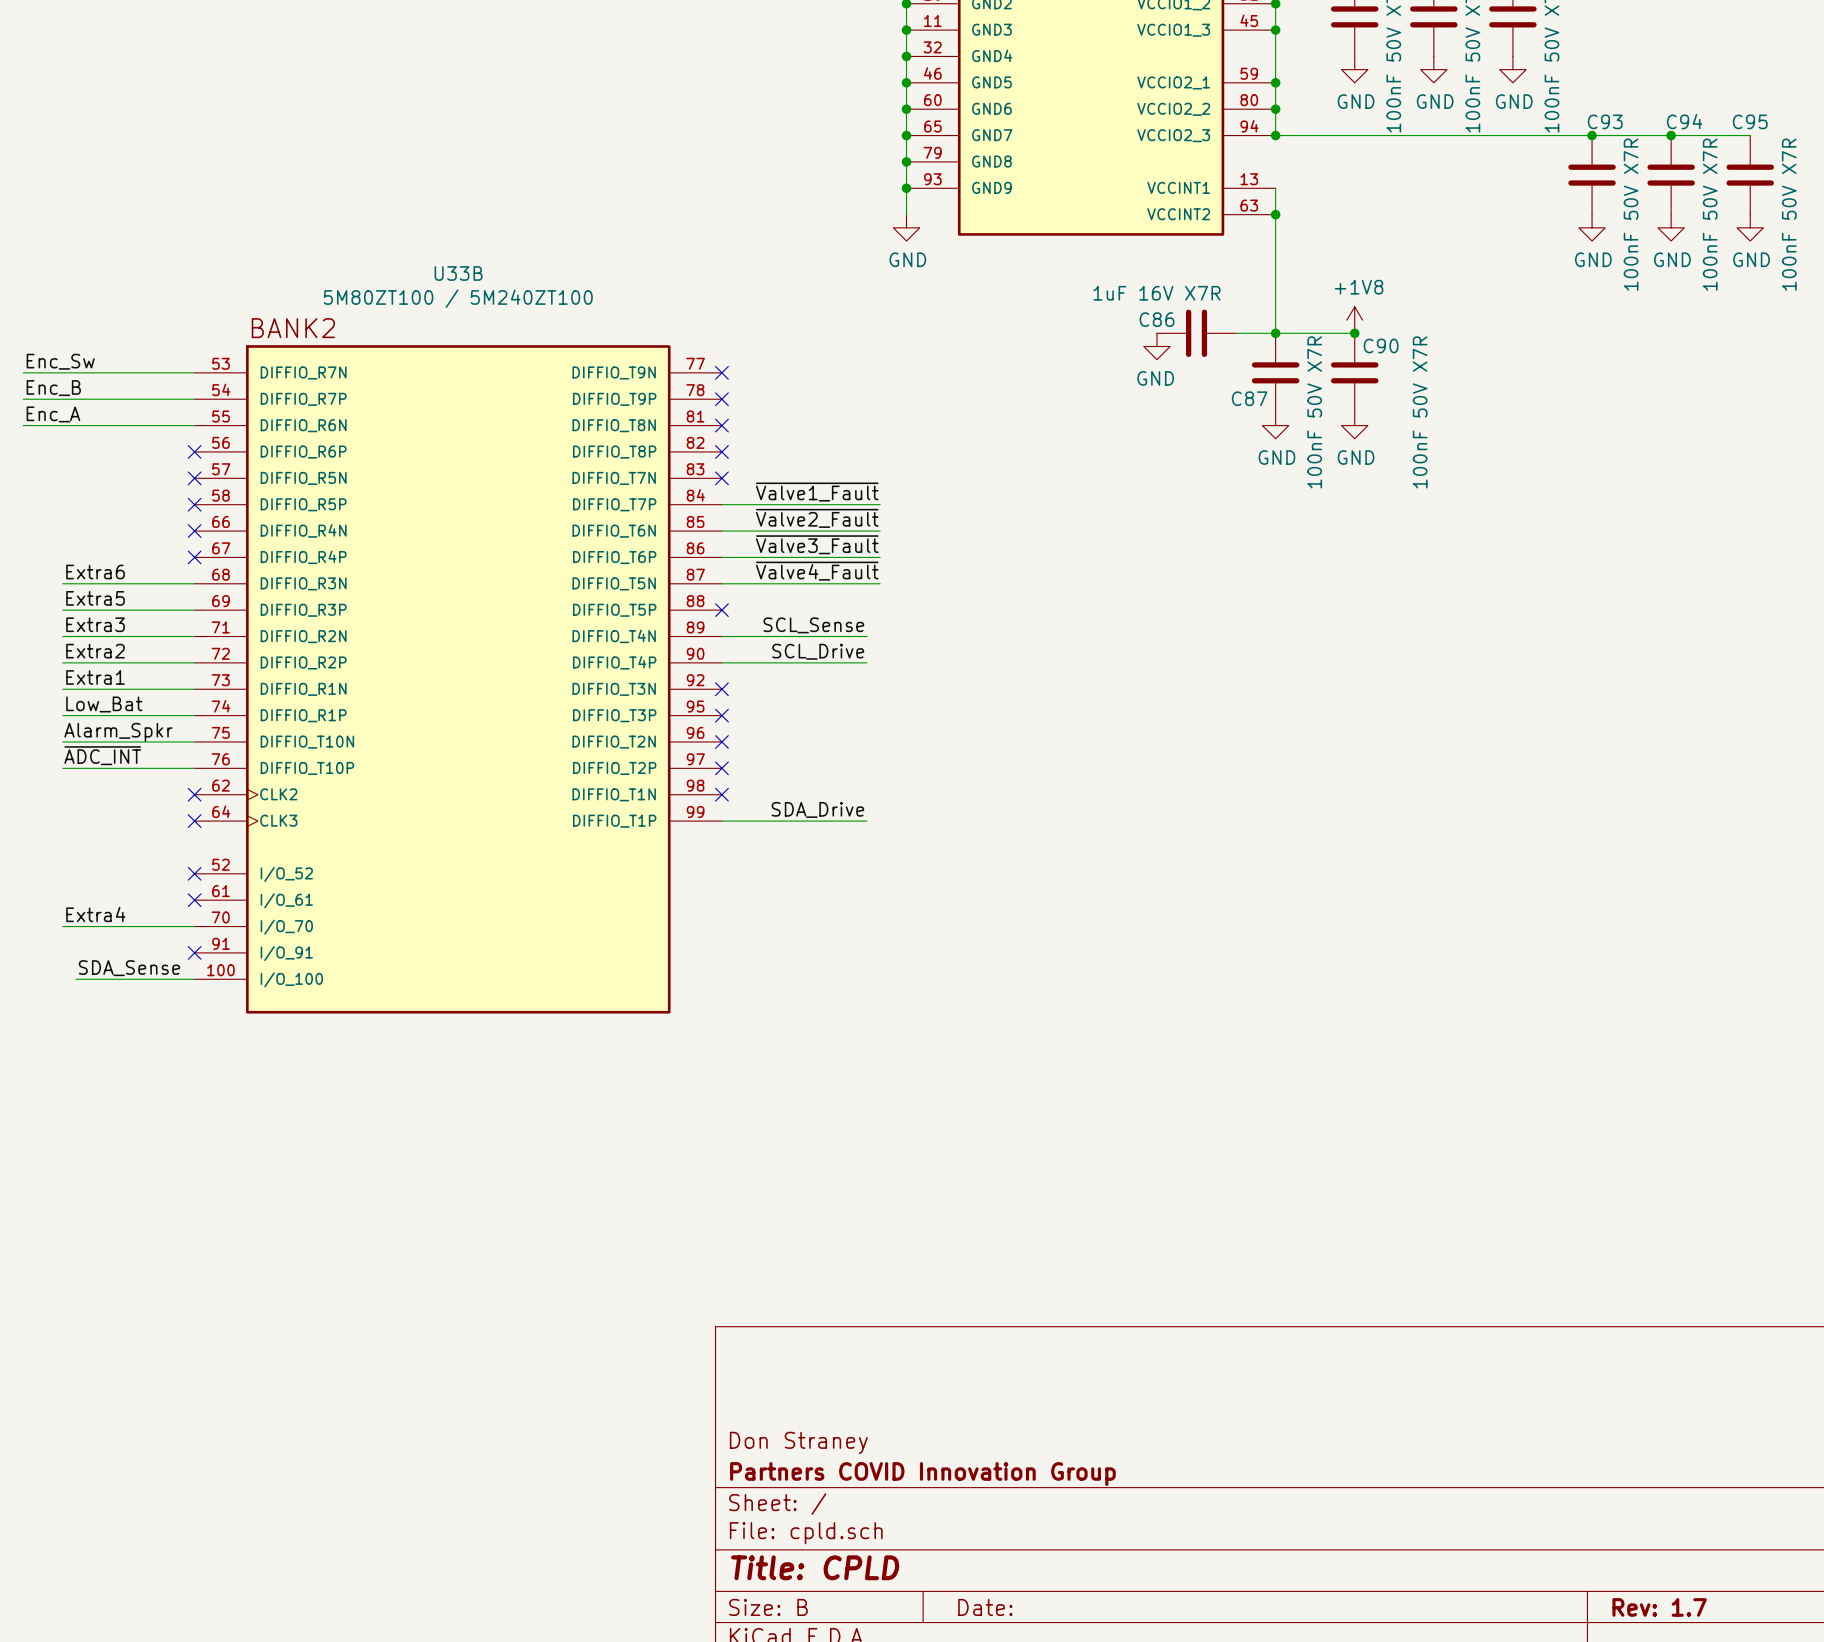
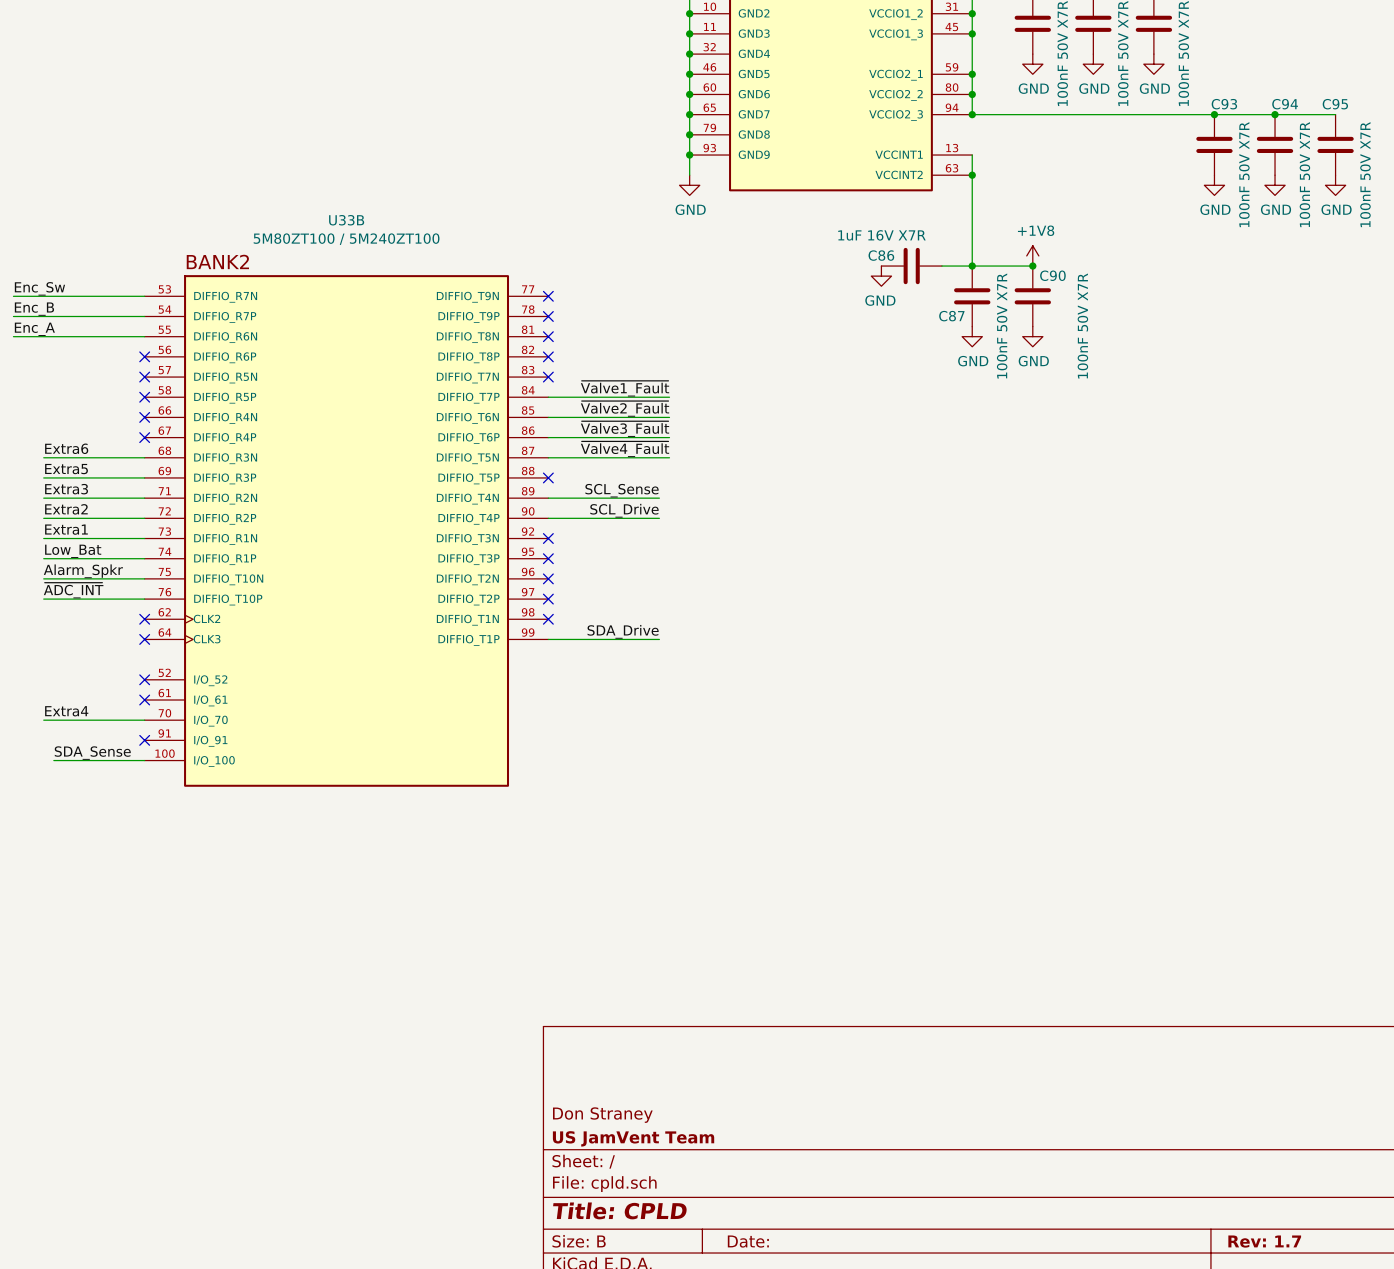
title block: Partners COVID Innovation Group (922, 1474) -> US JamVent Team (633, 1138)

